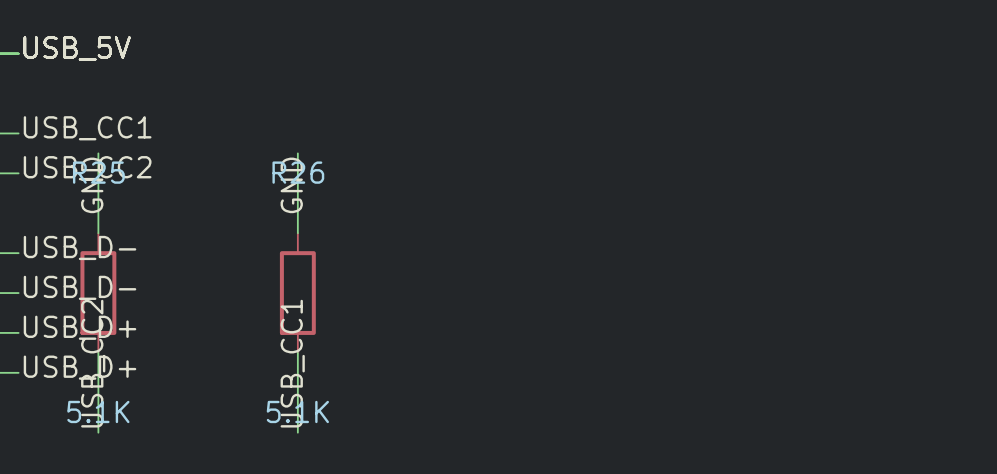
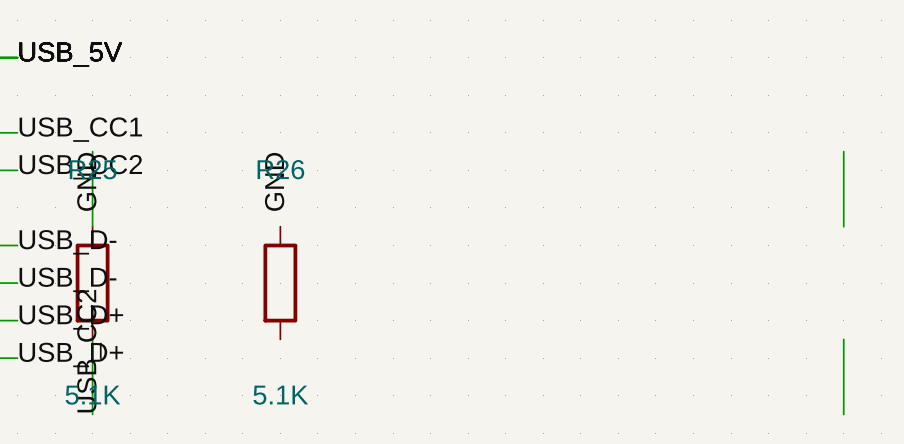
wire: (297, 153) (297, 233) -> none
wire: none -> (843, 151) (843, 226)
wire: (297, 352) (297, 432) -> none
wire: none -> (843, 339) (843, 414)
label: USB_CC1 (292, 363) -> none

